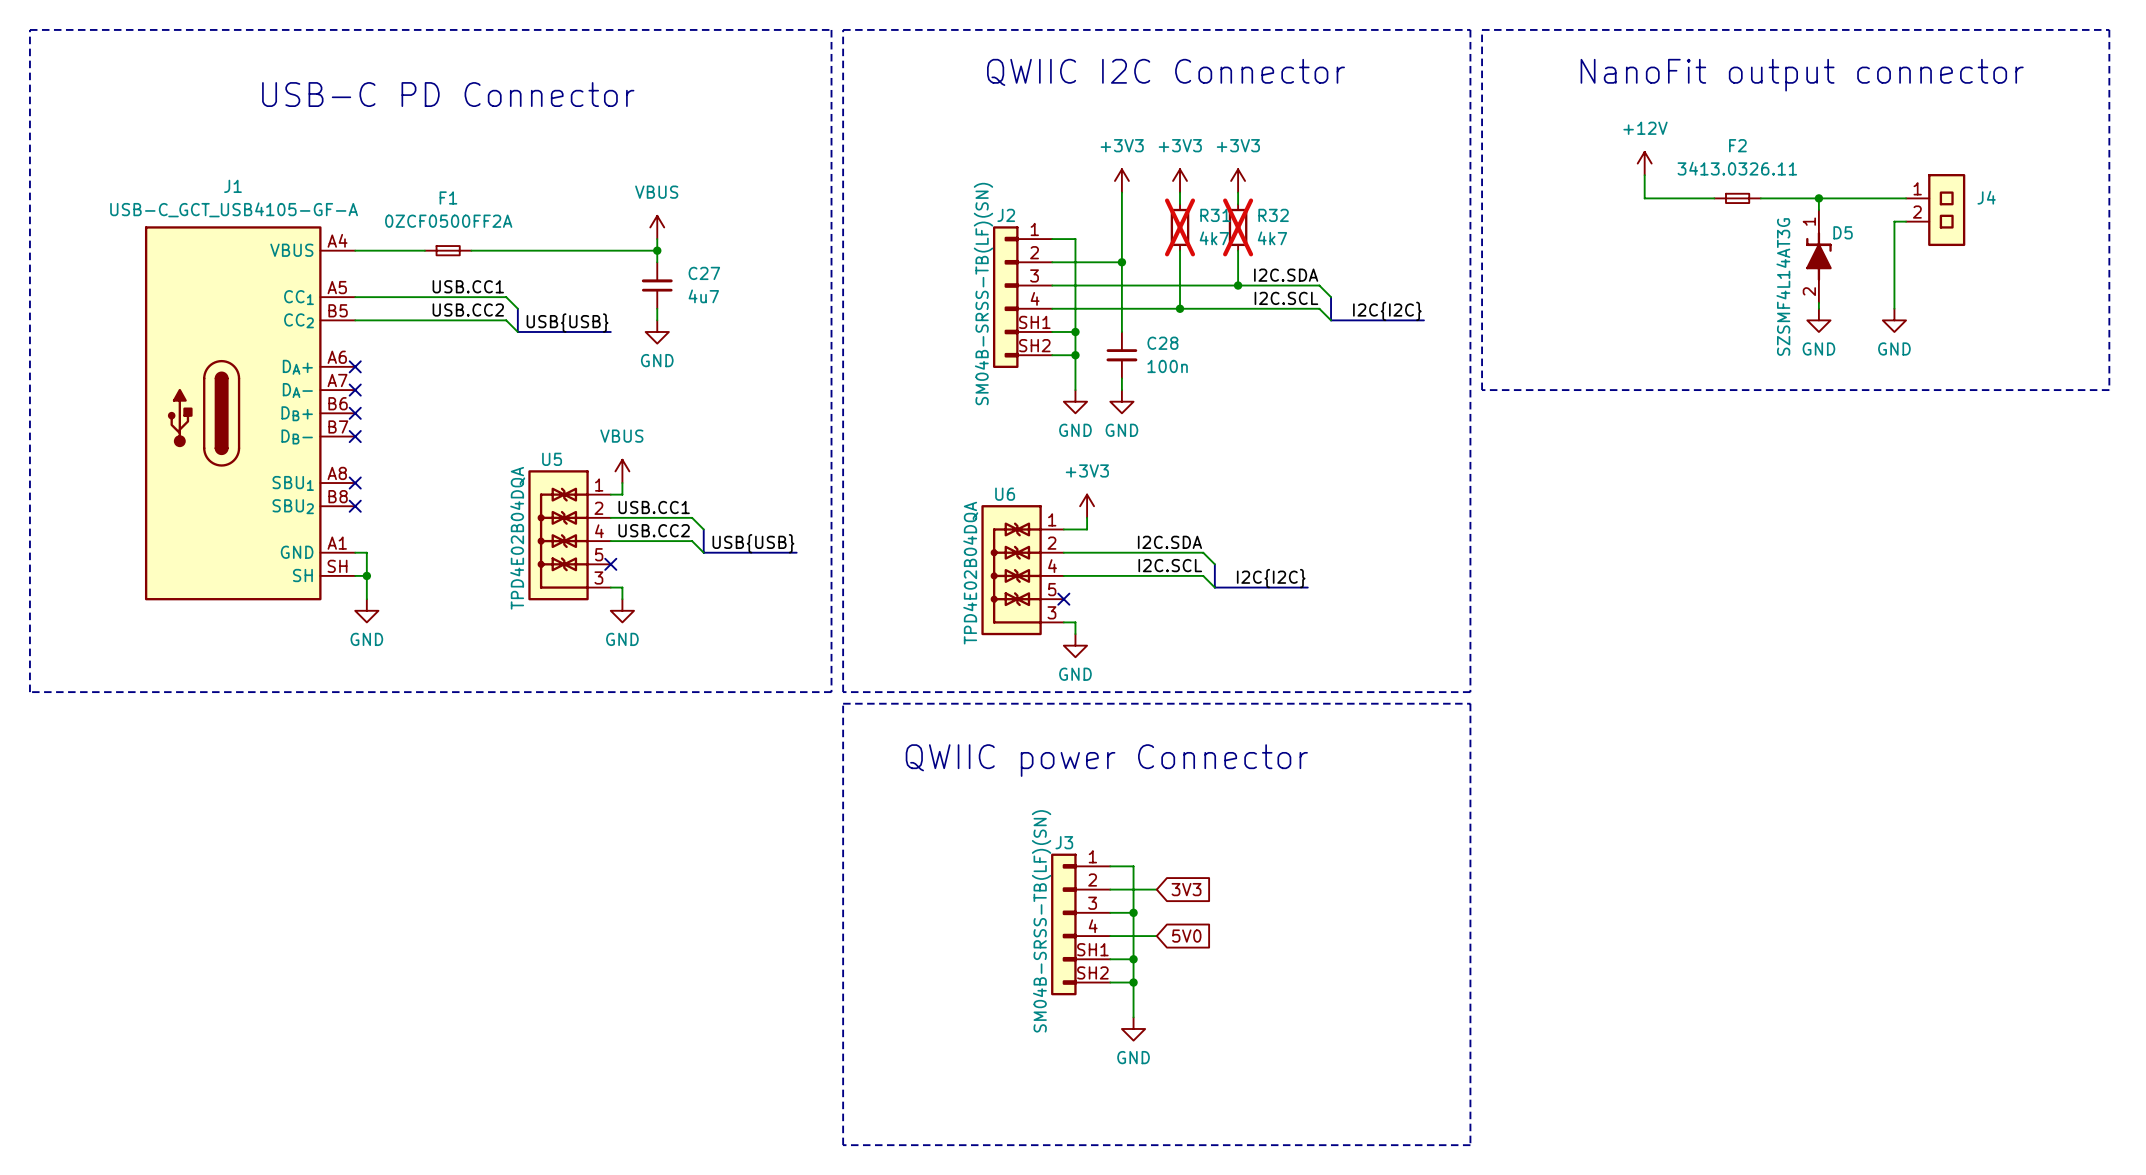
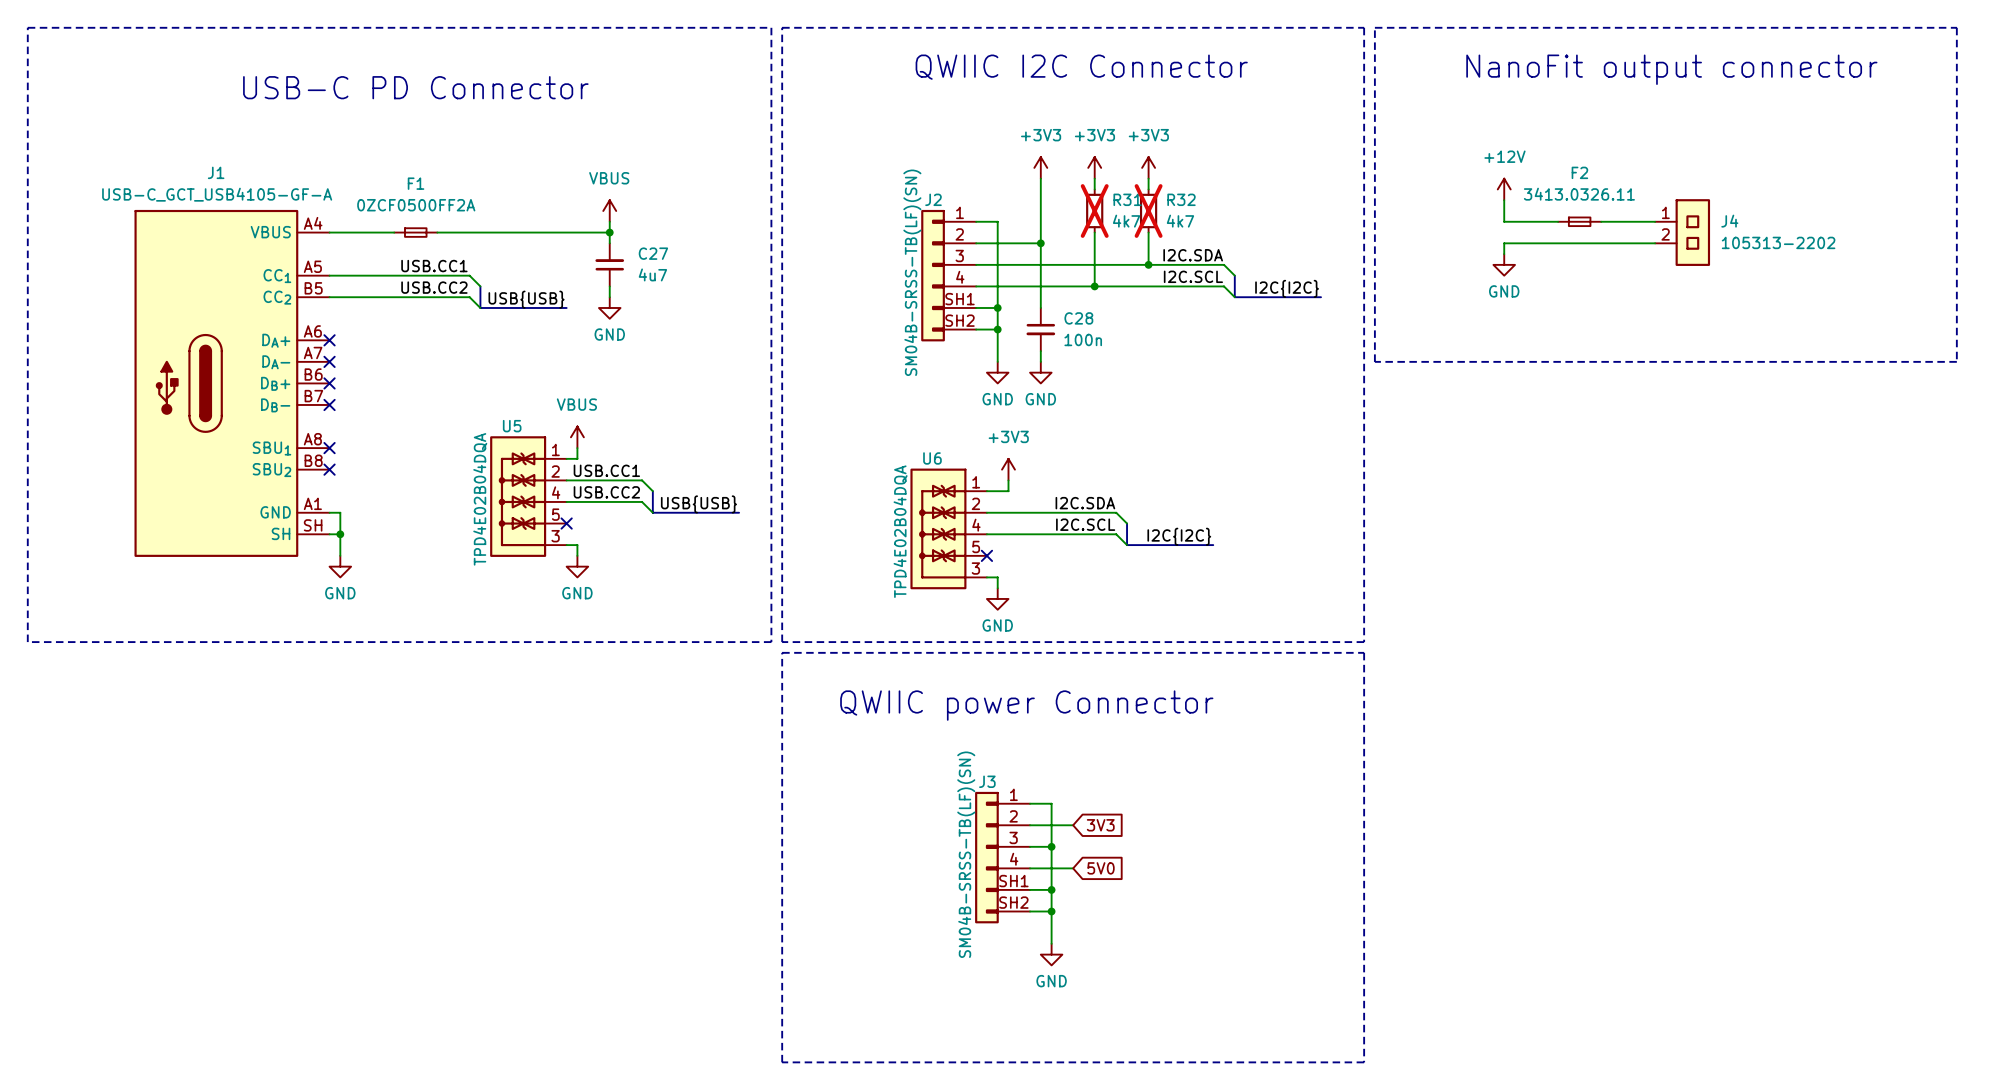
power symbol position: +12V (1644, 163) -> +12V (1504, 189)
wire: (1644, 175) (1644, 198) (1714, 198) -> none
F2 position: (1737, 198) -> (1579, 221)
wire: (1760, 198) (1906, 198) -> none
wire: (1818, 198) (1818, 210) -> none
junction: (1818, 198) -> none
J4 position: (1935, 210) -> (1682, 232)
wire: none -> (1504, 200) (1504, 221) (1558, 221)
wire: (1906, 221) (1894, 221) (1894, 308) -> none
wire: none -> (1601, 221) (1655, 221)
D5: (1818, 256) -> none
J4 text: none -> 105313-2202 (1778, 242)
wire: none -> (1655, 243) (1504, 243) (1504, 254)
power symbol: none -> GND (1504, 264)
wire: (1818, 302) (1818, 308) -> none
power symbol: GND (1818, 320) -> none
power symbol: GND (1894, 320) -> none

